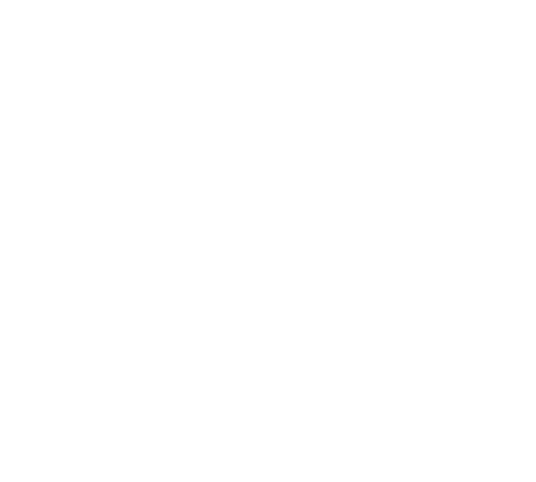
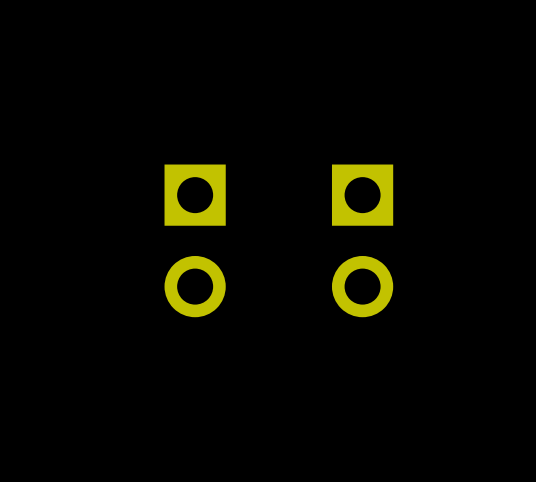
part: none -> (195, 240)
part: none -> (362, 240)

